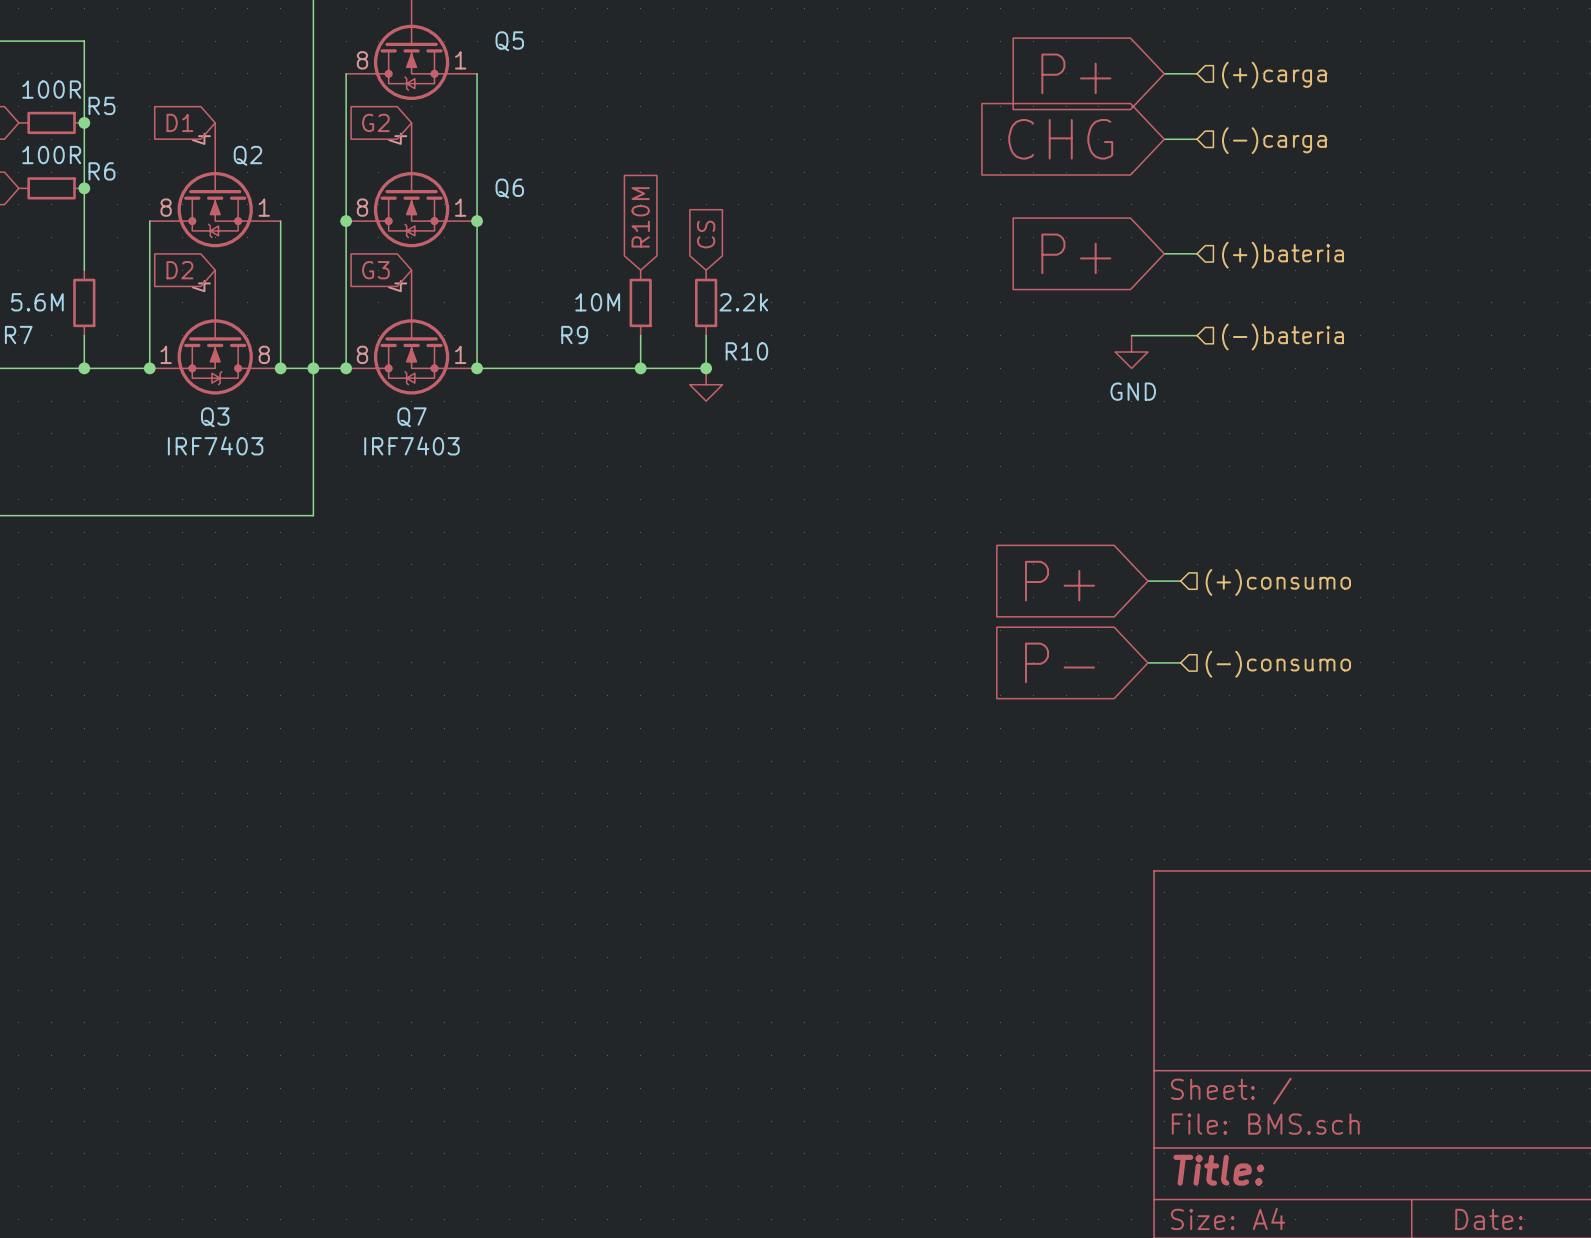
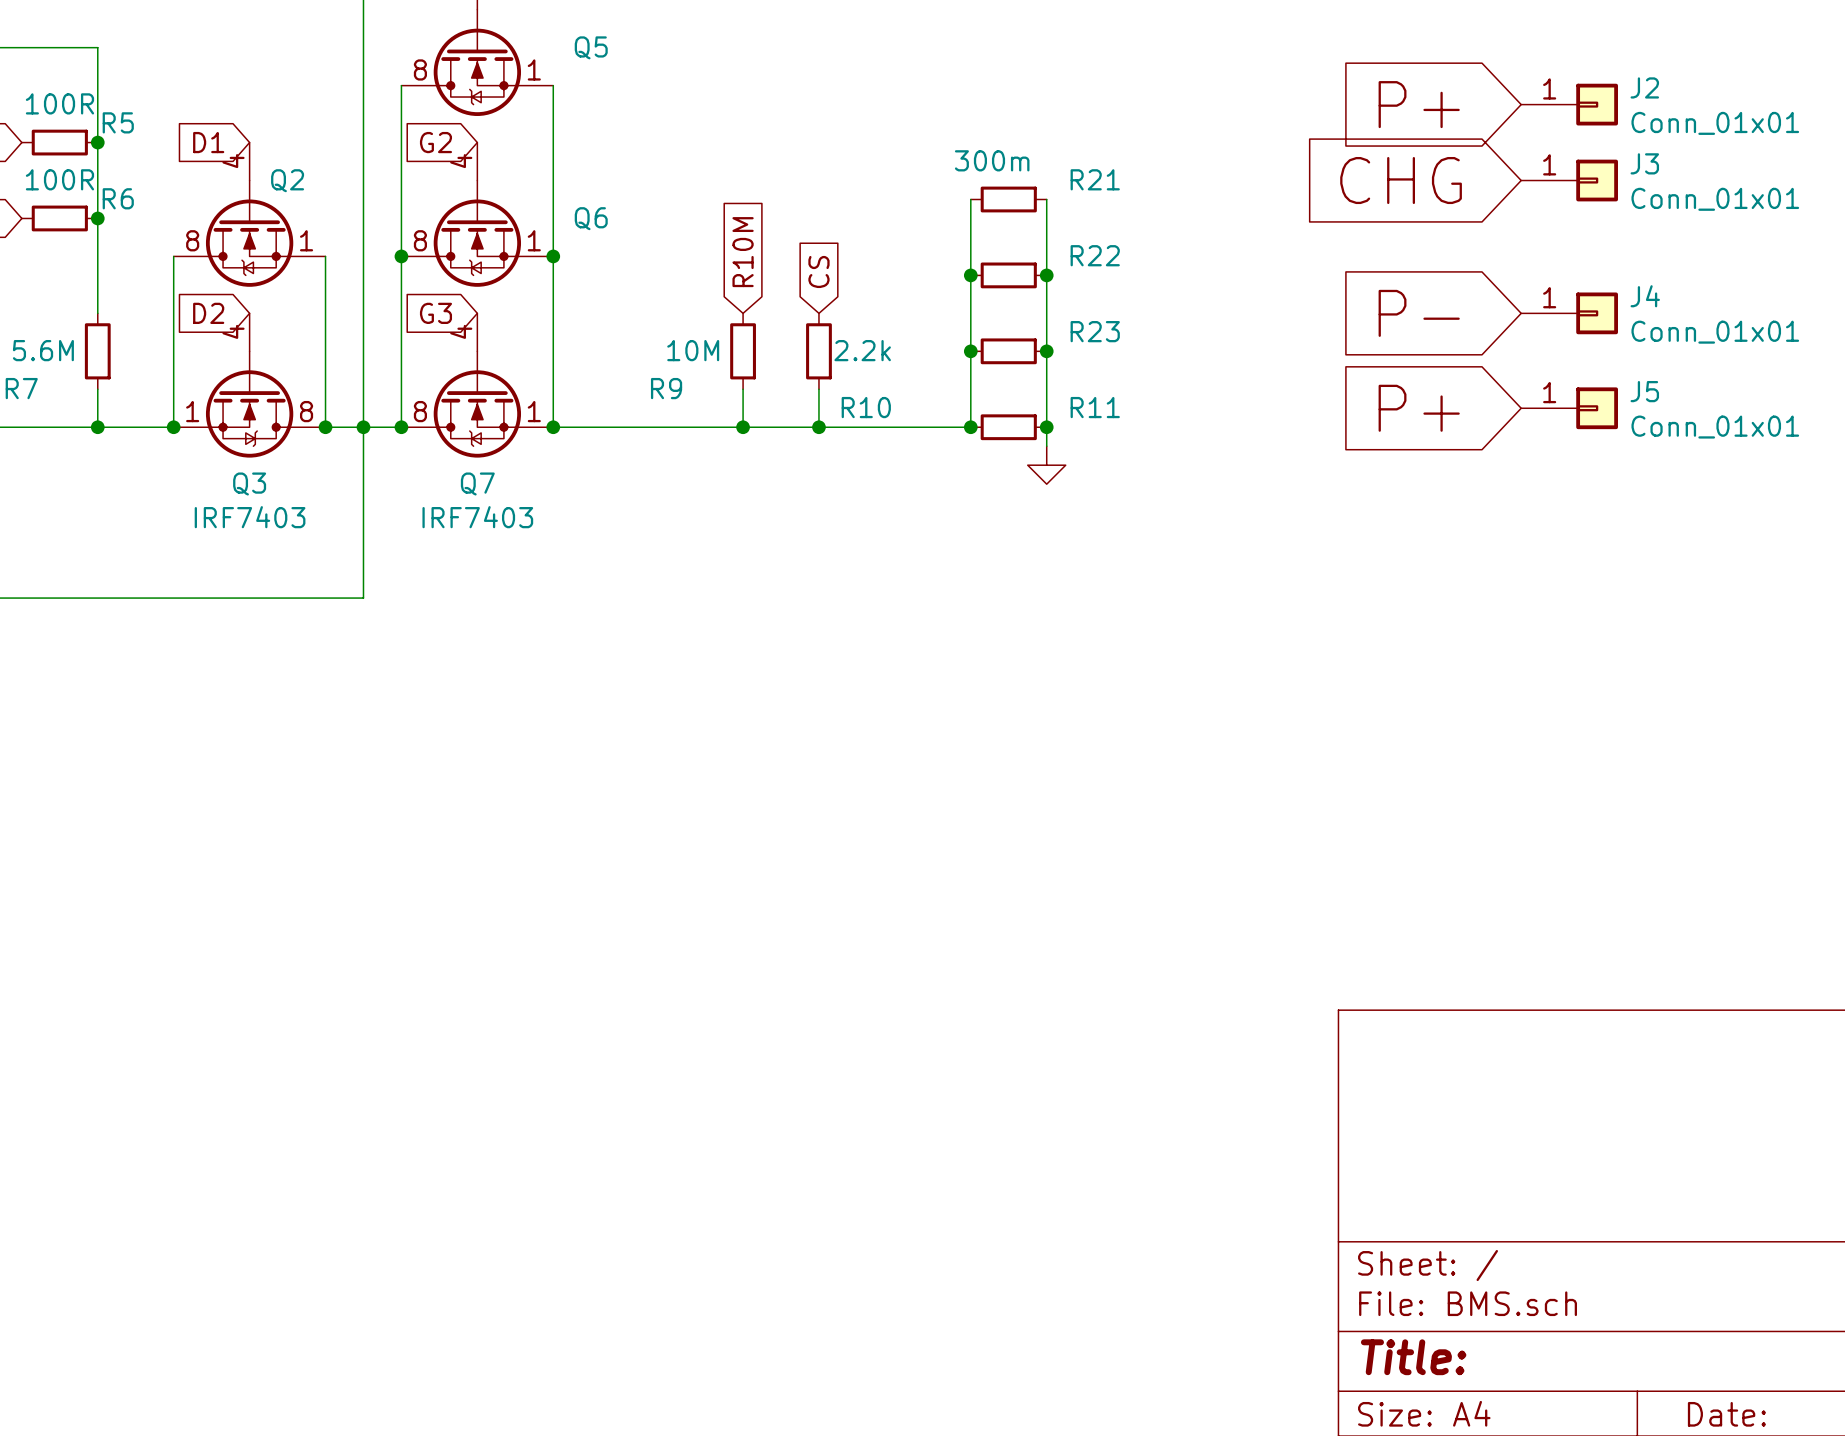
global label position: P+ (1076, 73) -> P+ (1419, 104)
wire: (1164, 73) (1197, 73) -> none
hierarchical label: (+)carga (1274, 75) -> none
J2: none -> Conn_01x01 (1569, 104)
global label position: CHG (1060, 139) -> CHG (1401, 180)
wire: (1164, 139) (1197, 139) -> none
hierarchical label: (-)carga (1274, 140) -> none
J3: none -> Conn_01x01 (1569, 180)
wire: none -> (970, 199) (970, 427) (818, 427)
R21: none -> 300m (1008, 199)
wire: none -> (1046, 199) (1046, 446)
junction: none -> (970, 275)
R22: none -> (1008, 275)
junction: none -> (1046, 275)
global label: P+ (1076, 253) -> none
wire: (1164, 253) (1197, 253) -> none
hierarchical label: (+)bateria (1283, 255) -> none
global label: none -> P- (1419, 313)
J4: none -> Conn_01x01 (1569, 313)
junction: none -> (970, 351)
R23: none -> (1008, 351)
junction: none -> (1046, 351)
wire: (1131, 335) (1197, 335) -> none
hierarchical label: (-)bateria (1283, 336) -> none
power symbol: GND (1131, 352) -> none
global label: none -> P+ (1419, 408)
J5: none -> Conn_01x01 (1569, 408)
junction: none -> (970, 427)
R11: none -> (1008, 427)
junction: none -> (1046, 427)
power symbol position: (706, 384) -> (1046, 465)
global label: P+ (1059, 581) -> none
wire: (1147, 581) (1180, 581) -> none
hierarchical label: (+)consumo (1278, 582) -> none
global label: P- (1059, 662) -> none
wire: (1147, 662) (1180, 662) -> none
hierarchical label: (-)consumo (1278, 664) -> none

